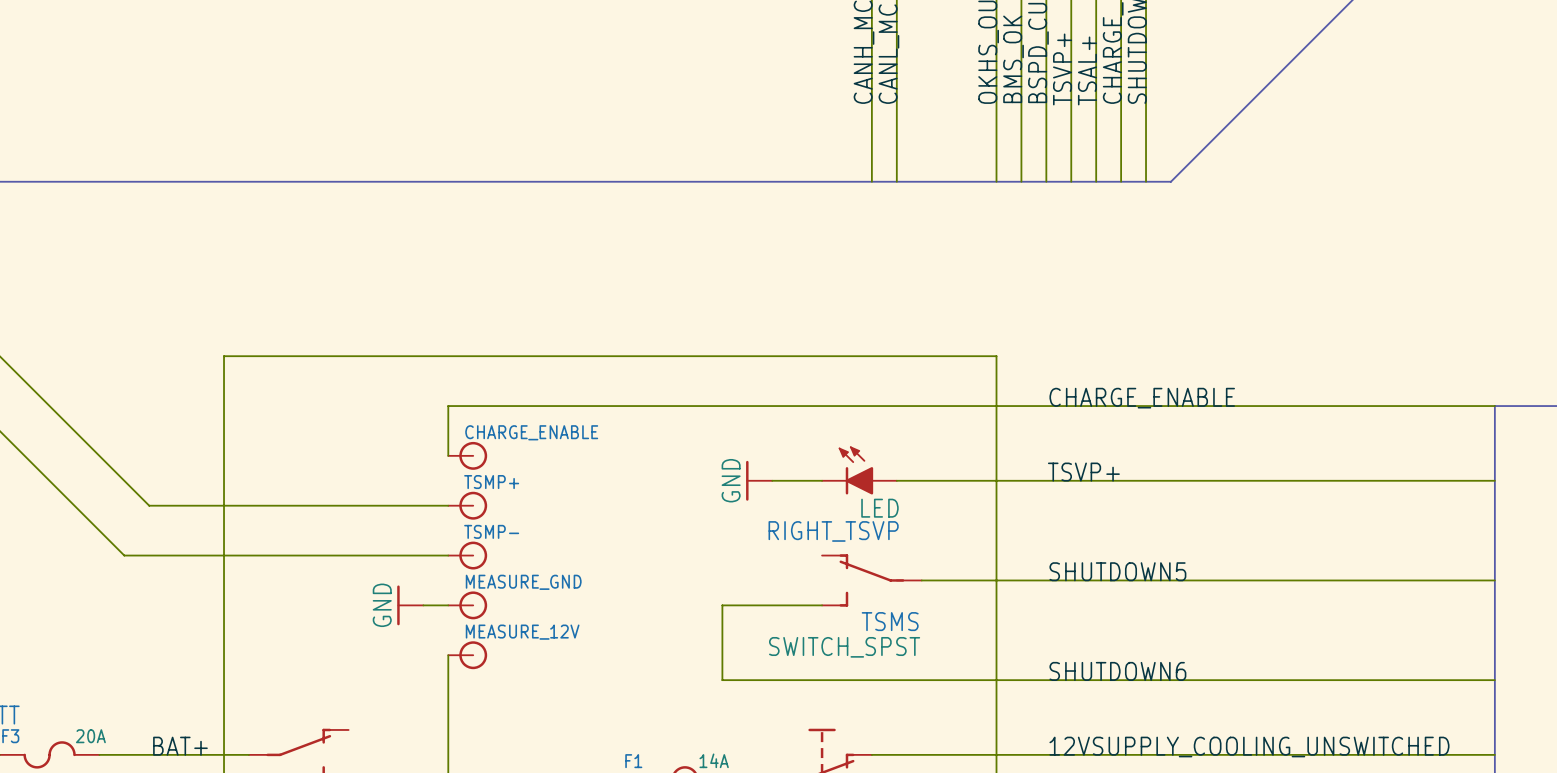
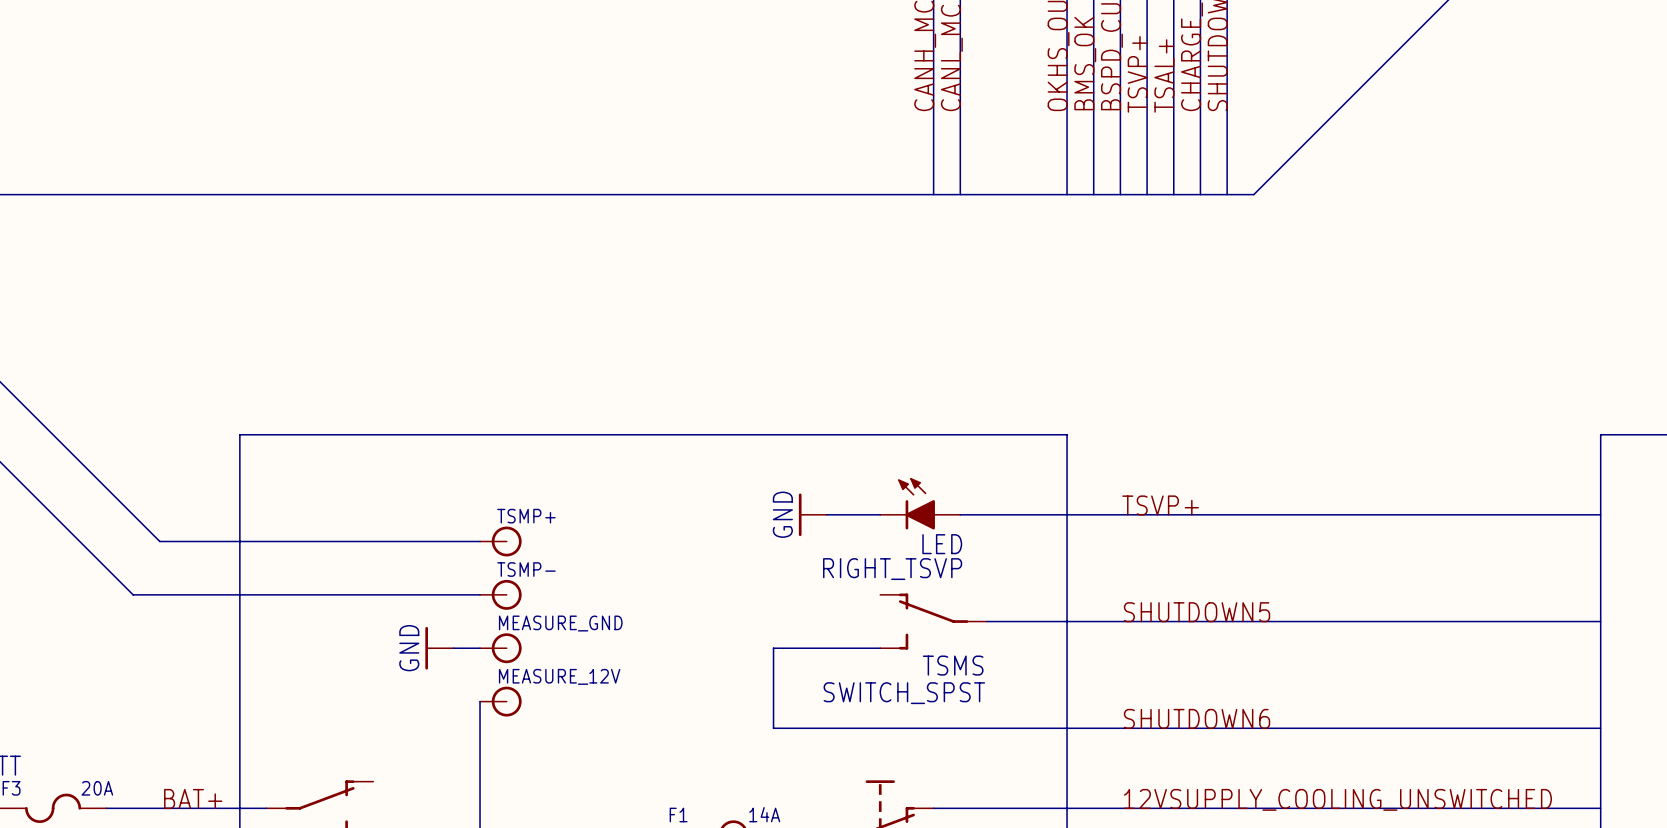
label: CHARGE_ENABLE (1142, 398) -> none
wire: (224, 406) (224, 356) (996, 356) (996, 406) (1494, 406) -> none
wire: (448, 406) (448, 455) -> (480, 434) (239, 434)
CHARGE_ENABLE: (467, 455) -> none

